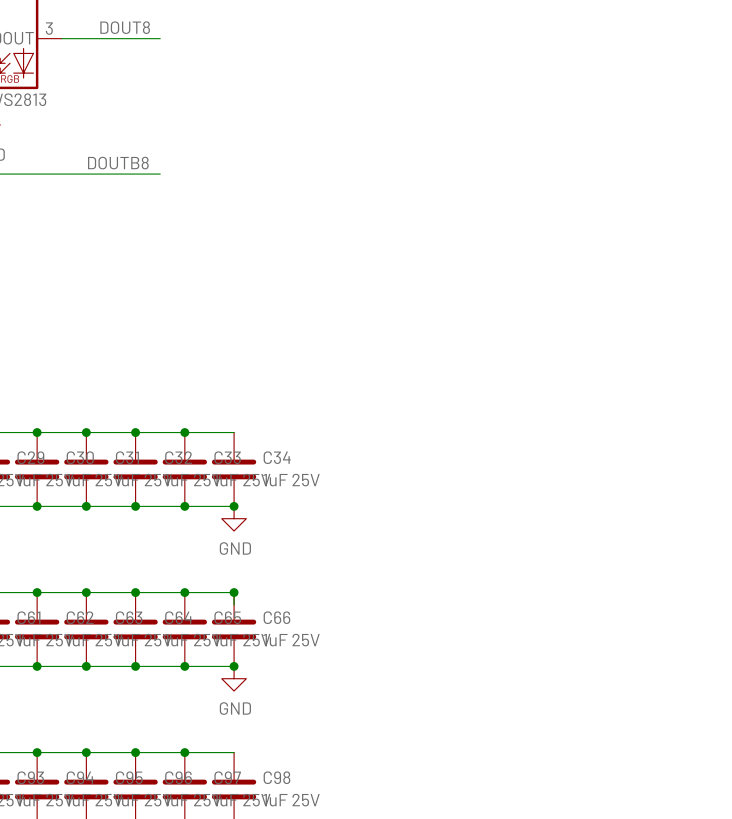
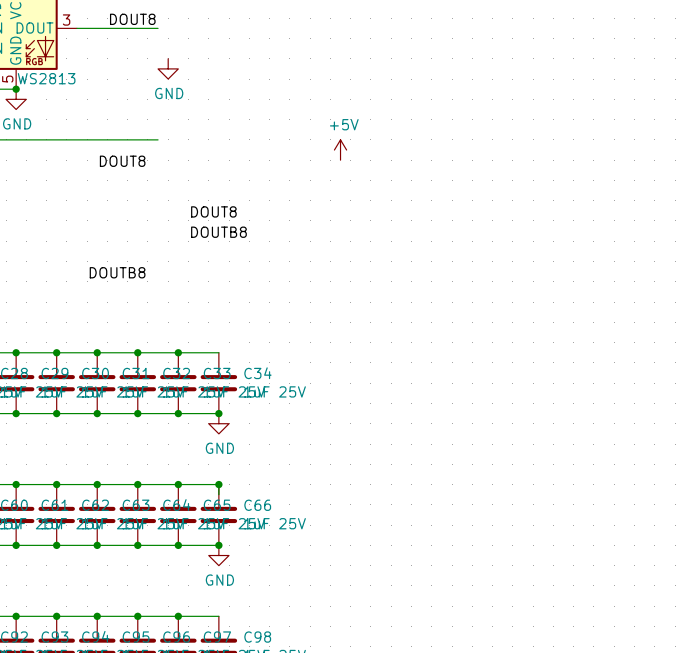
power symbol: none -> GND (168, 68)
label: DOUTB8 (118, 163) -> none
power symbol: none -> +5V (340, 150)
label: none -> DOUT8 (122, 161)
label: none -> DOUT8 (213, 211)
label: none -> DOUTB8 (218, 232)
label: none -> DOUTB8 (117, 272)

